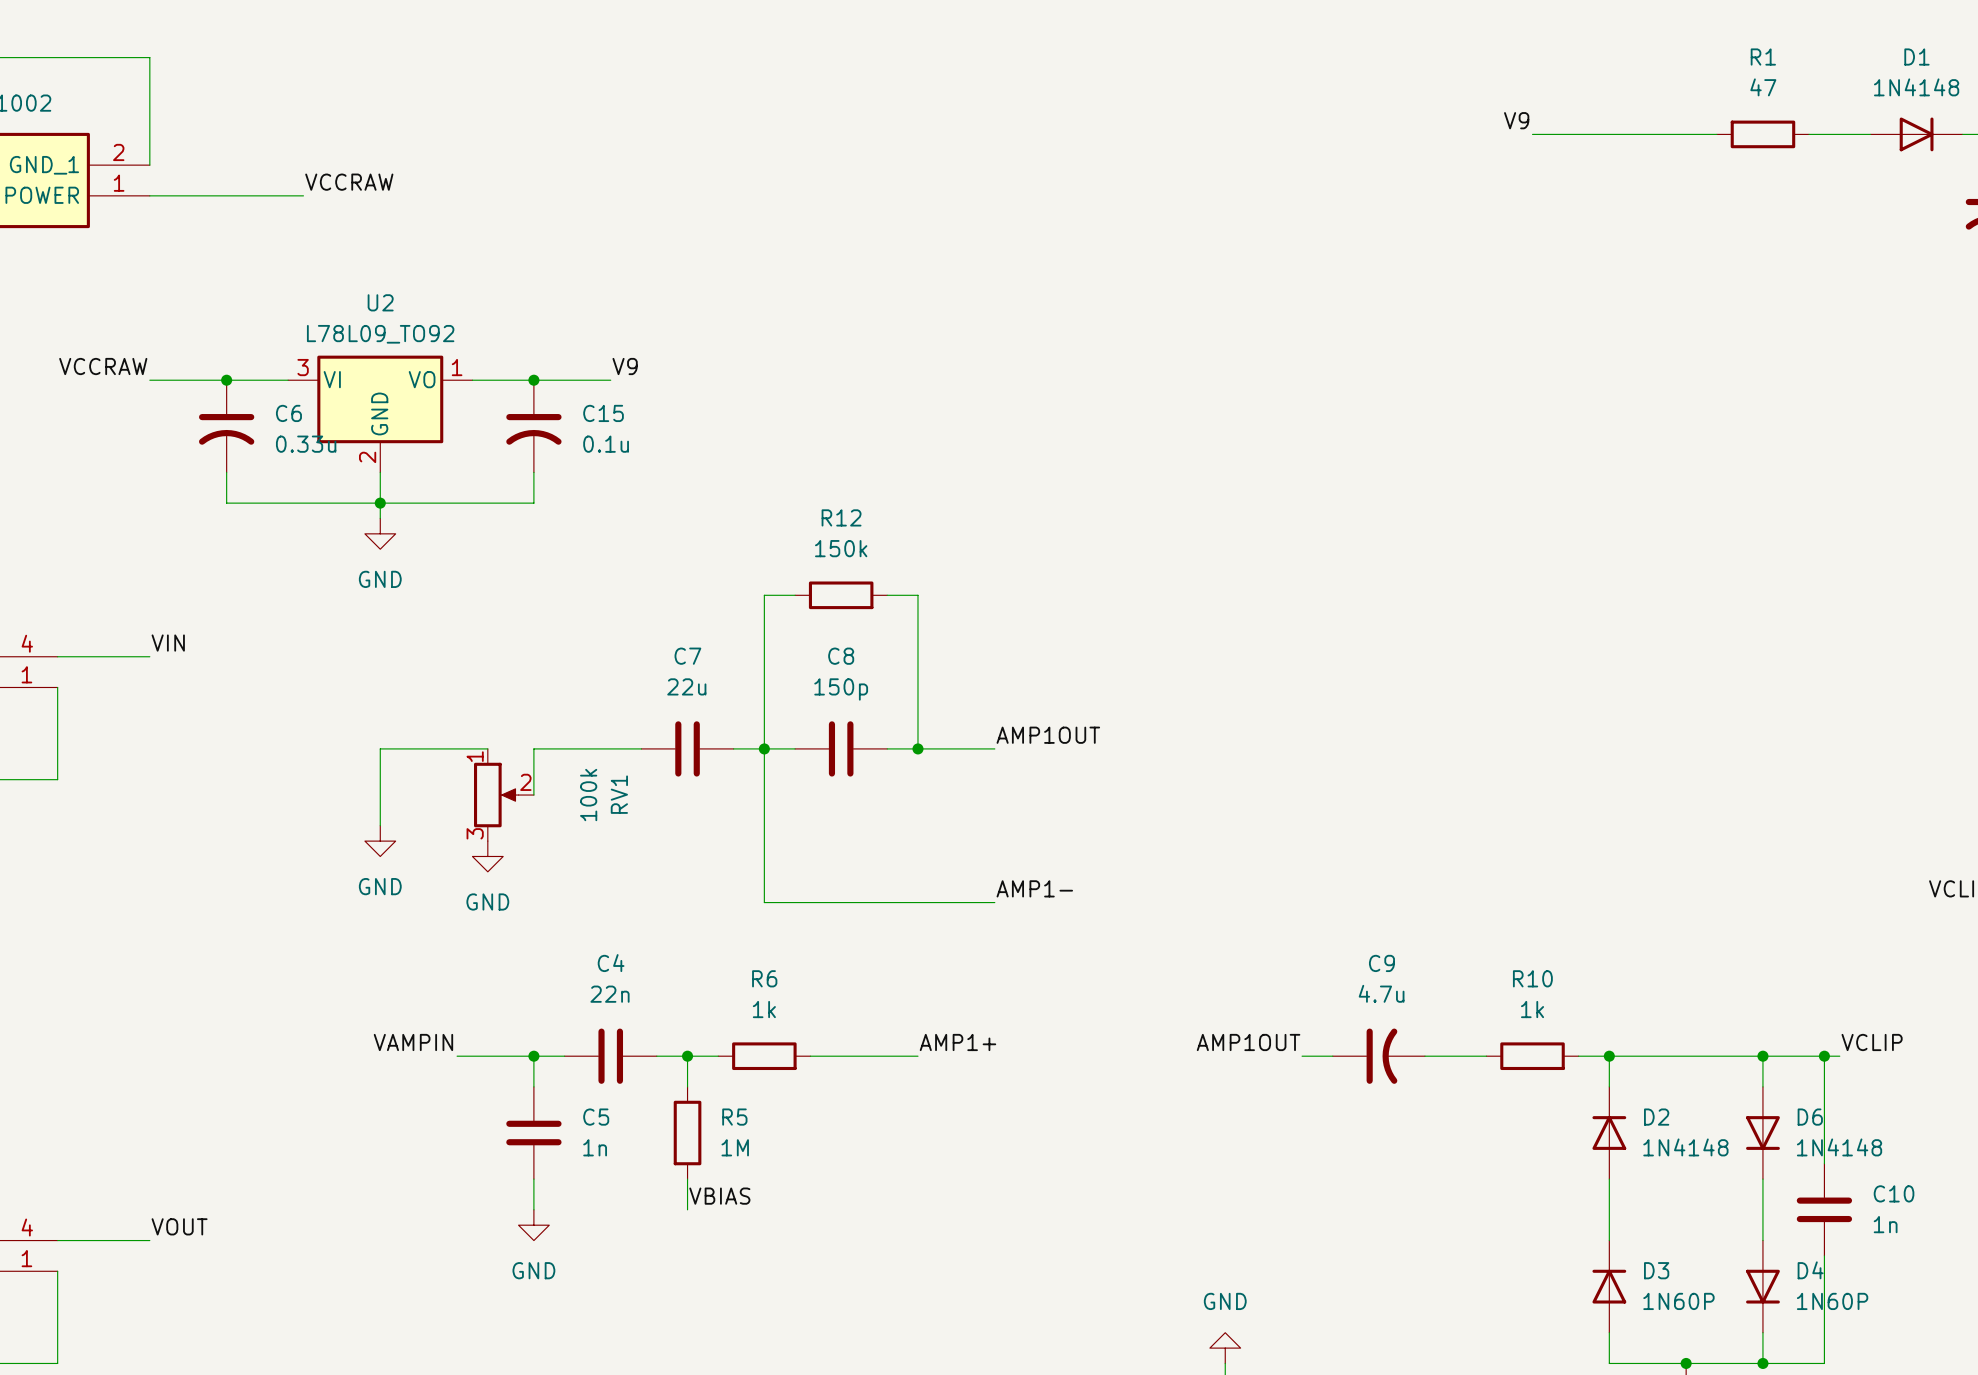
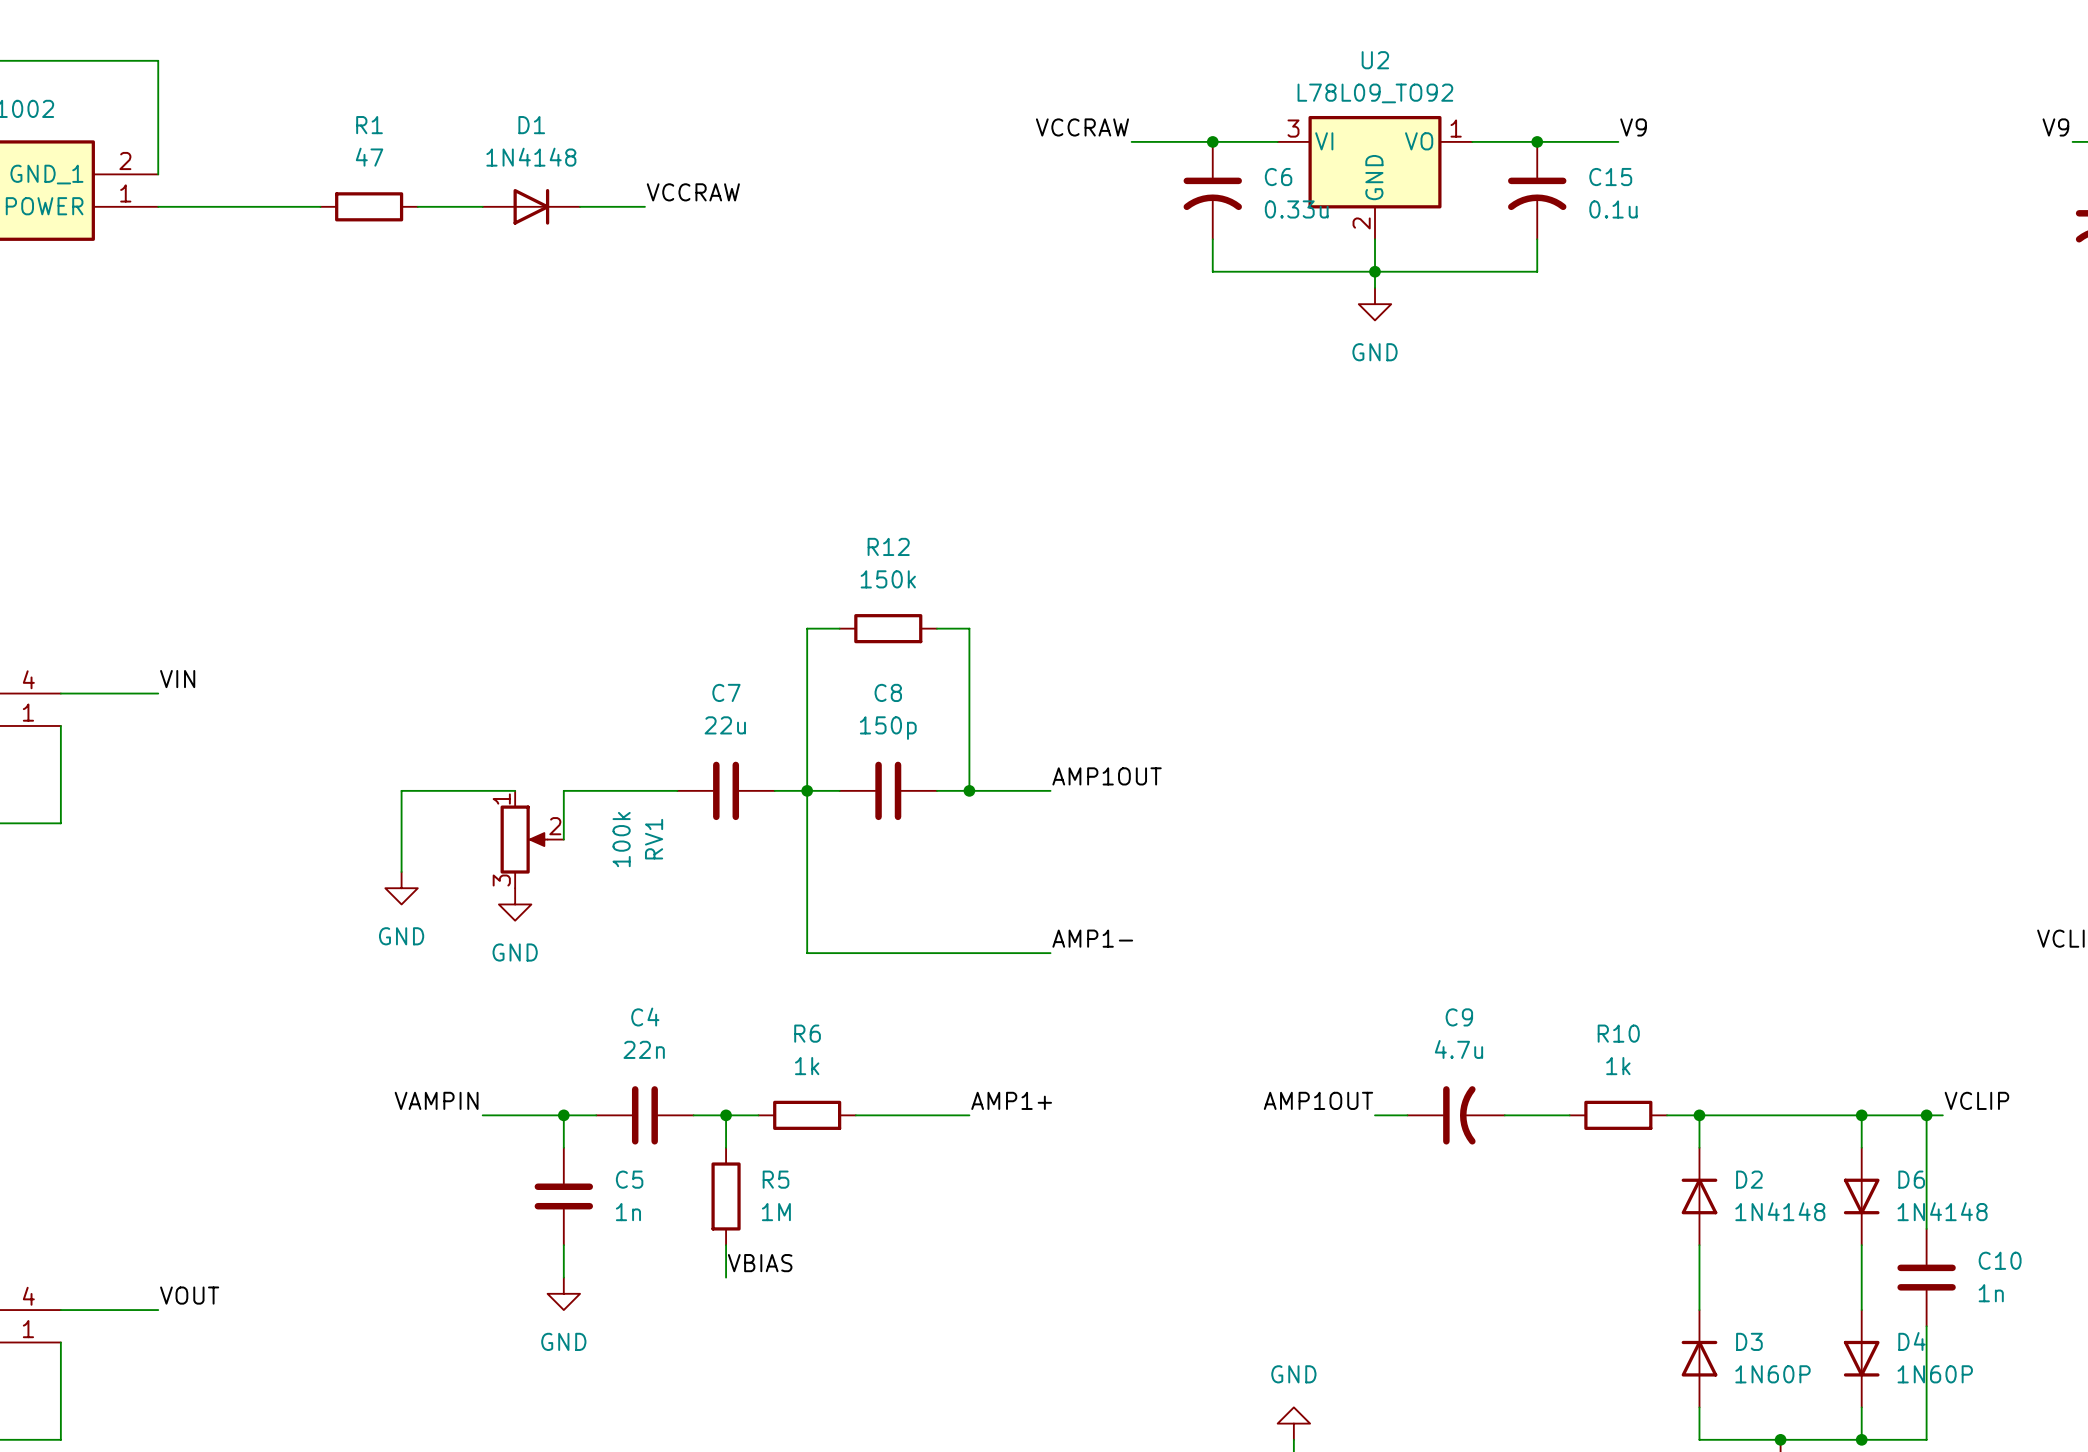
label: none -> VCCRAW (1082, 127)
label position: V9 (1516, 120) -> V9 (1633, 127)
label: none -> V9 (2055, 127)
wire: none -> (1131, 141) (1277, 141)
junction: none -> (1212, 141)
junction: none -> (1537, 141)
wire: (1532, 134) (1716, 134) -> (1618, 141) (1472, 141)
R1 position: (1762, 134) -> (369, 206)
wire: (1809, 134) (1870, 134) -> none
D1 position: (1916, 134) -> (531, 206)
label: VCCRAW (349, 182) -> none
label: none -> VCCRAW (693, 192)
wire: none -> (417, 206) (482, 206)
wire: none -> (580, 206) (644, 206)
wire: none -> (1212, 239) (1212, 271) (1537, 271) (1537, 239)
wire: none -> (1375, 239) (1375, 287)
junction: none -> (1375, 271)
power symbol: none -> GND (1375, 304)
label: VCCRAW (103, 366) -> none
label: V9 (625, 366) -> none
wire: (149, 380) (288, 380) -> none
junction: (226, 380) -> none
wire: (472, 380) (610, 380) -> none
junction: (533, 380) -> none
U2 position: (380, 414) -> (1375, 177)
C6 position: (226, 426) -> (1212, 190)
C15 position: (533, 426) -> (1537, 190)
wire: (226, 472) (226, 503) (533, 503) (533, 472) -> none
wire: (380, 472) (380, 518) -> none
junction: (380, 503) -> none
power symbol: GND (380, 533) -> none

